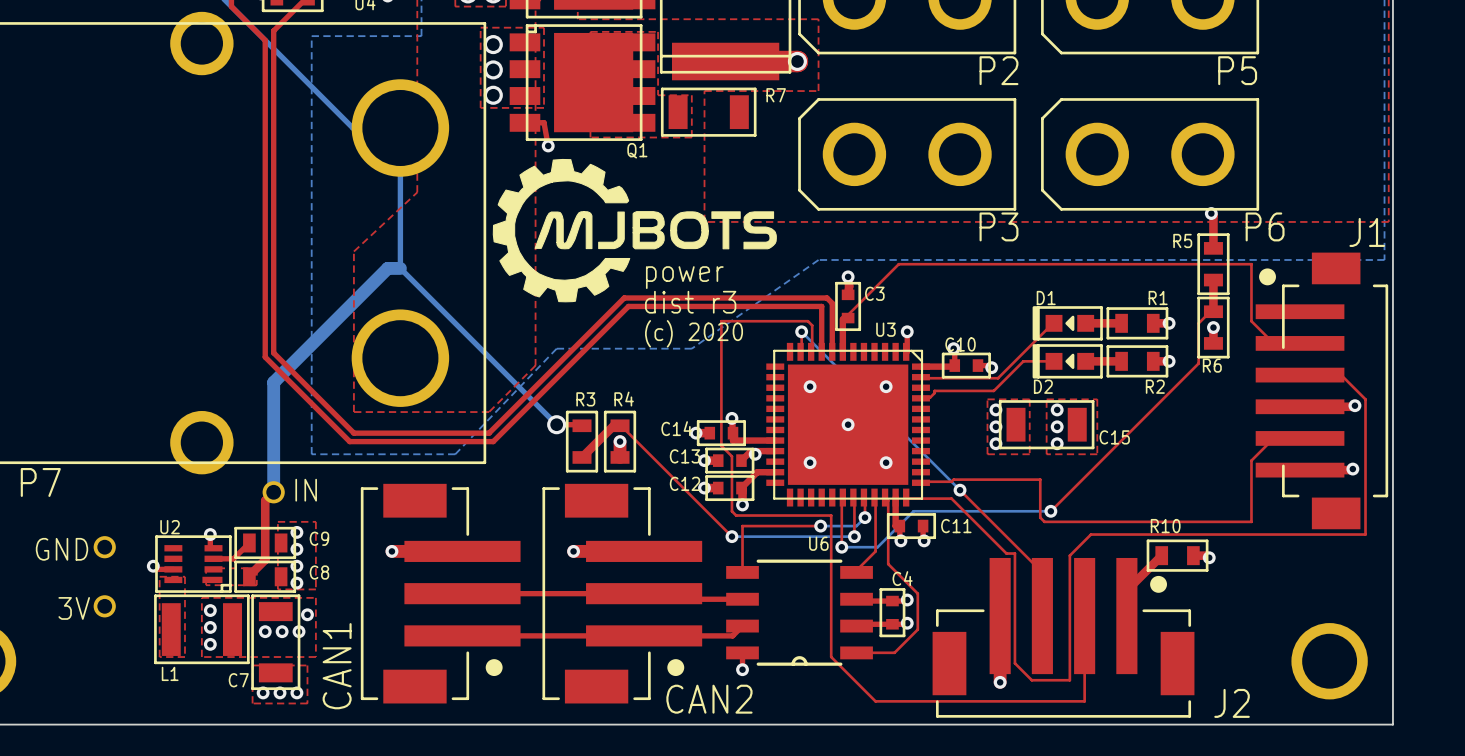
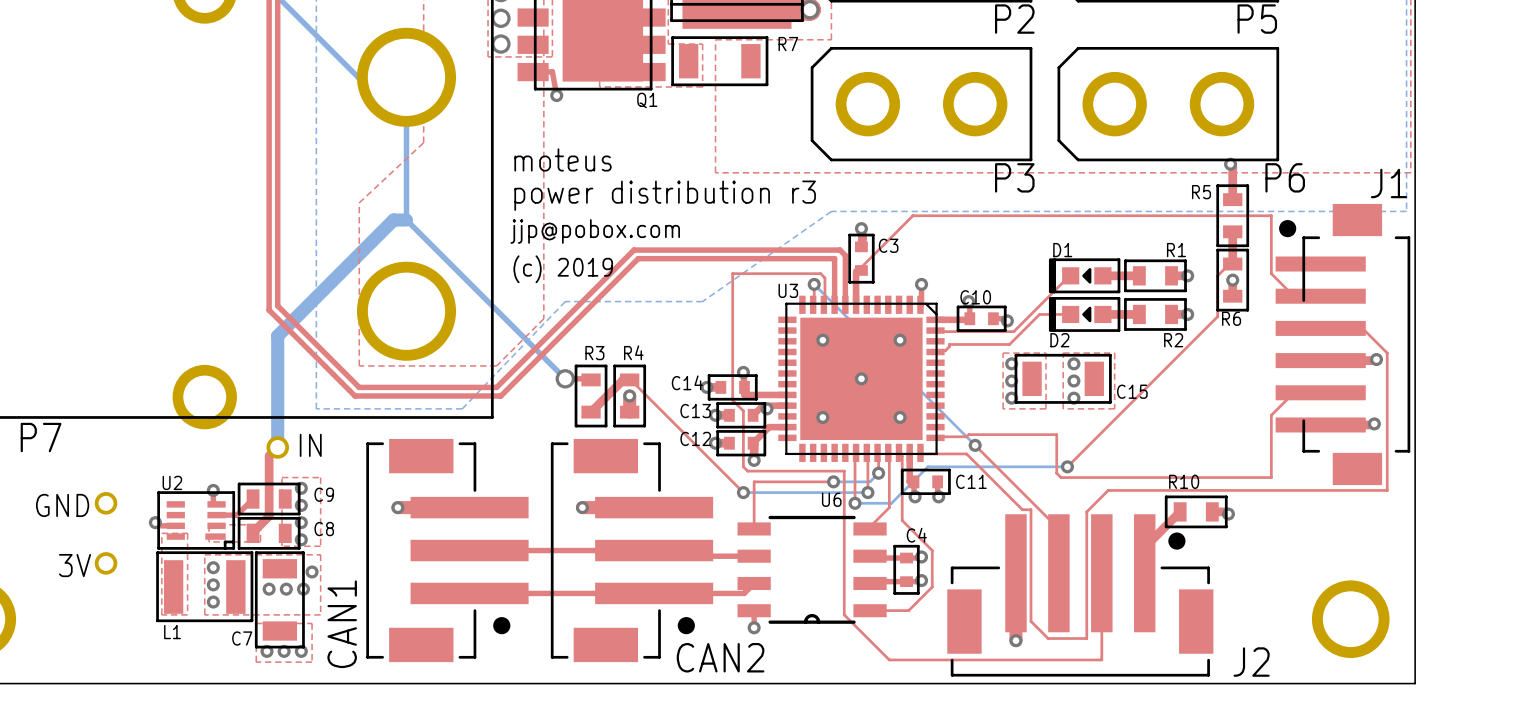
drawing: [492, 158, 777, 303] -> none
text: none -> moteus (563, 159)
text: none -> power distribution r3 (665, 195)
text: power (684, 277) -> none
text: none -> jjp@pobox.com (595, 231)
text: dist r3 (690, 302) -> none
text: none -> (c) 2019 (563, 269)
U3 name position: U3 (885, 329) -> U3 (788, 290)
text: (c) 2020 (694, 333) -> none

